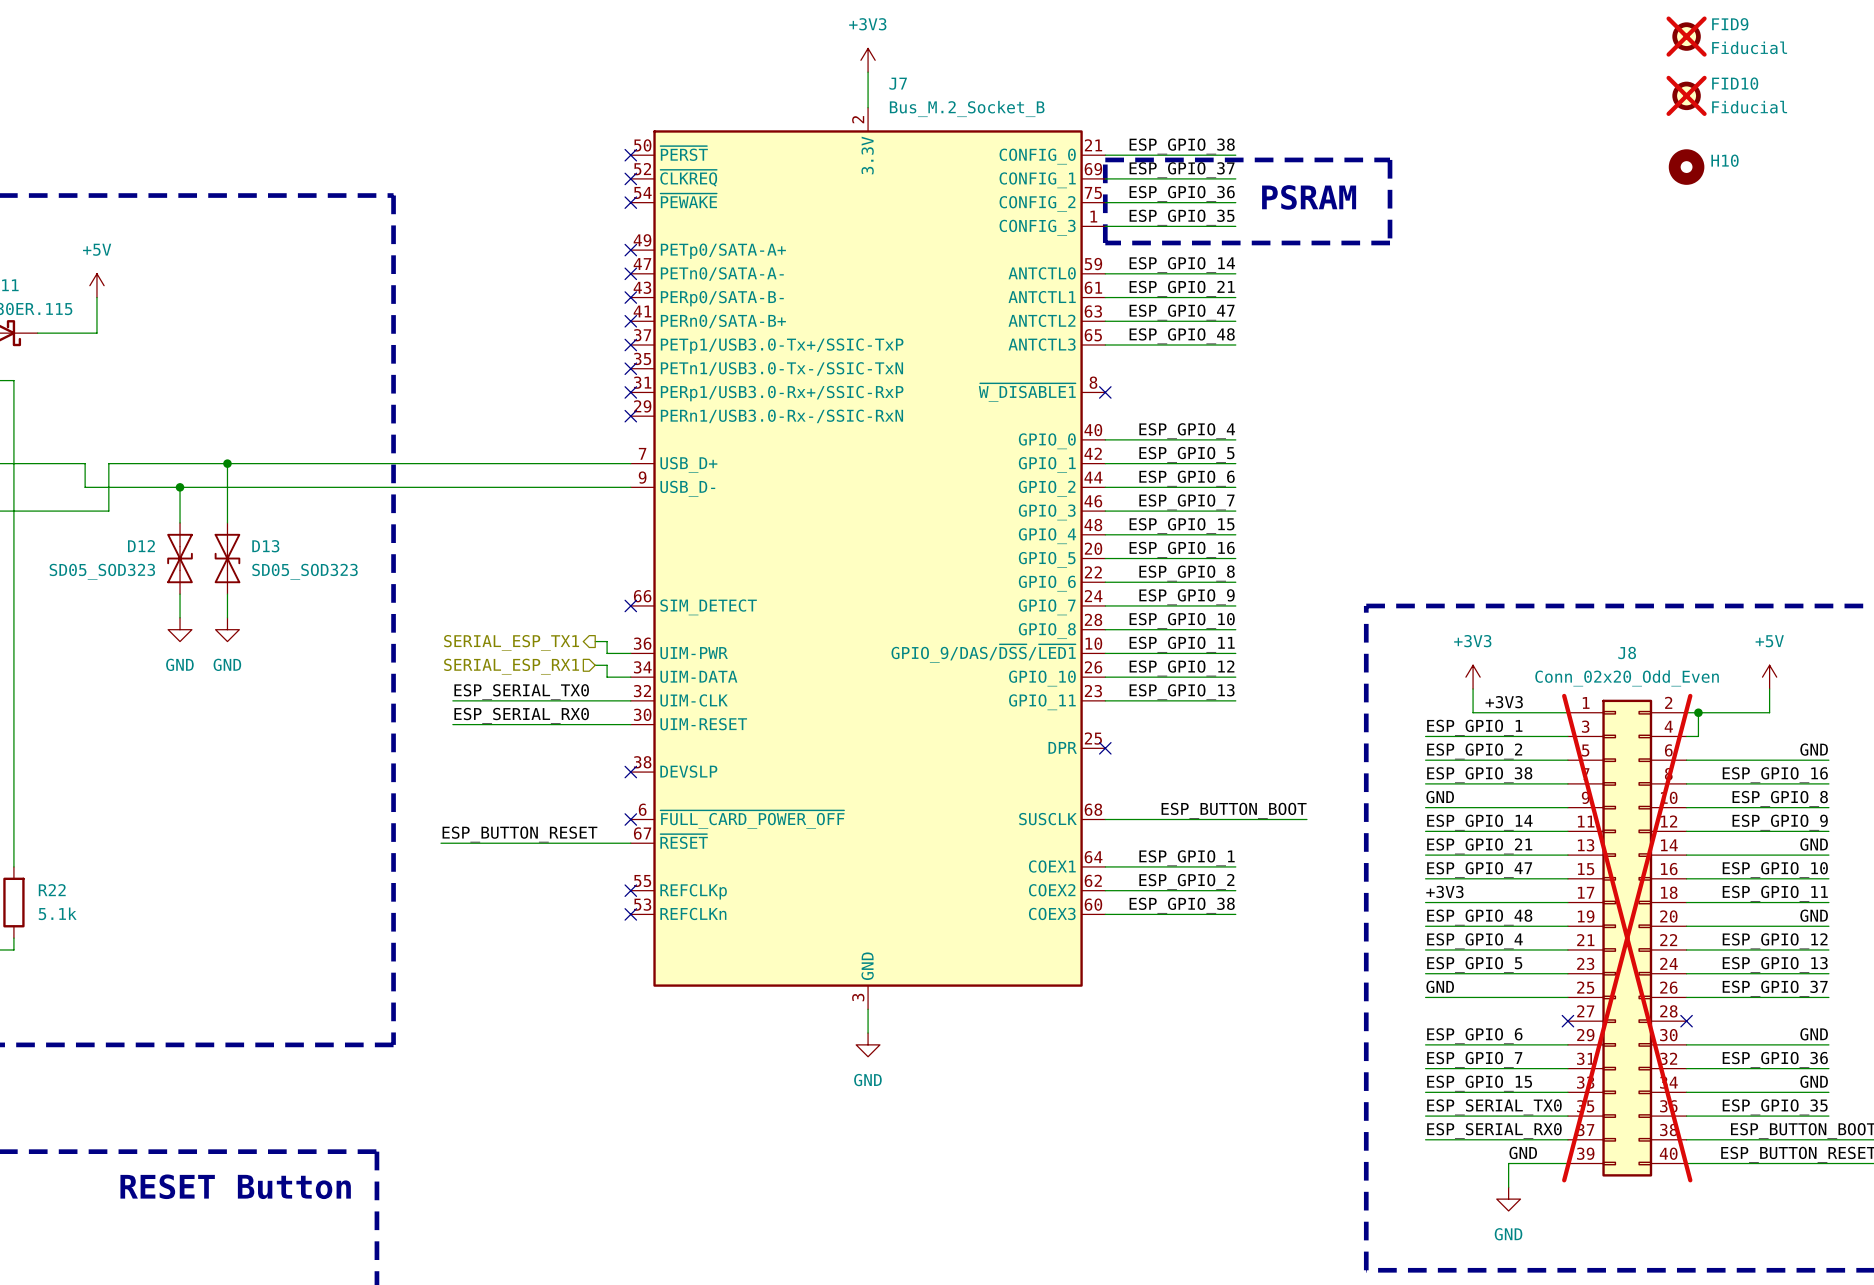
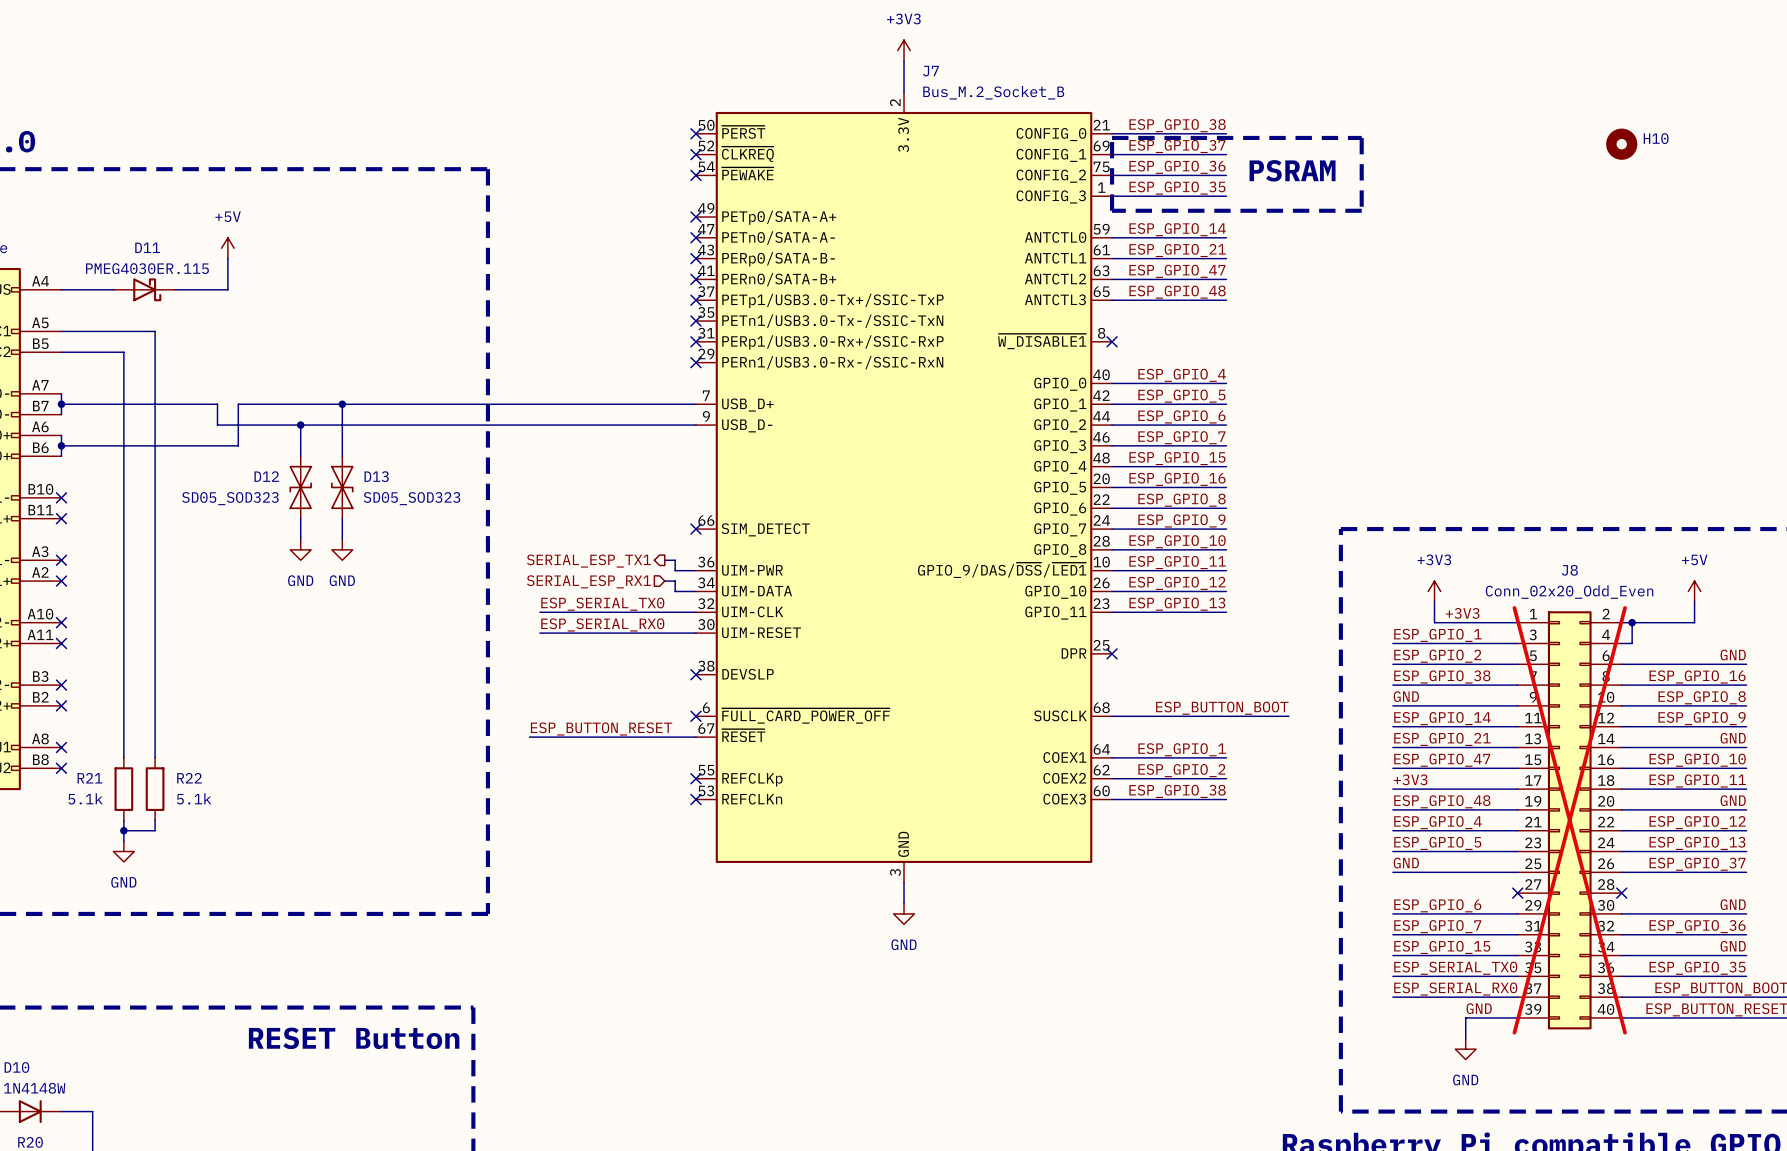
FID9: Fiducial (1686, 36) -> none
FID10: Fiducial (1686, 95) -> none

